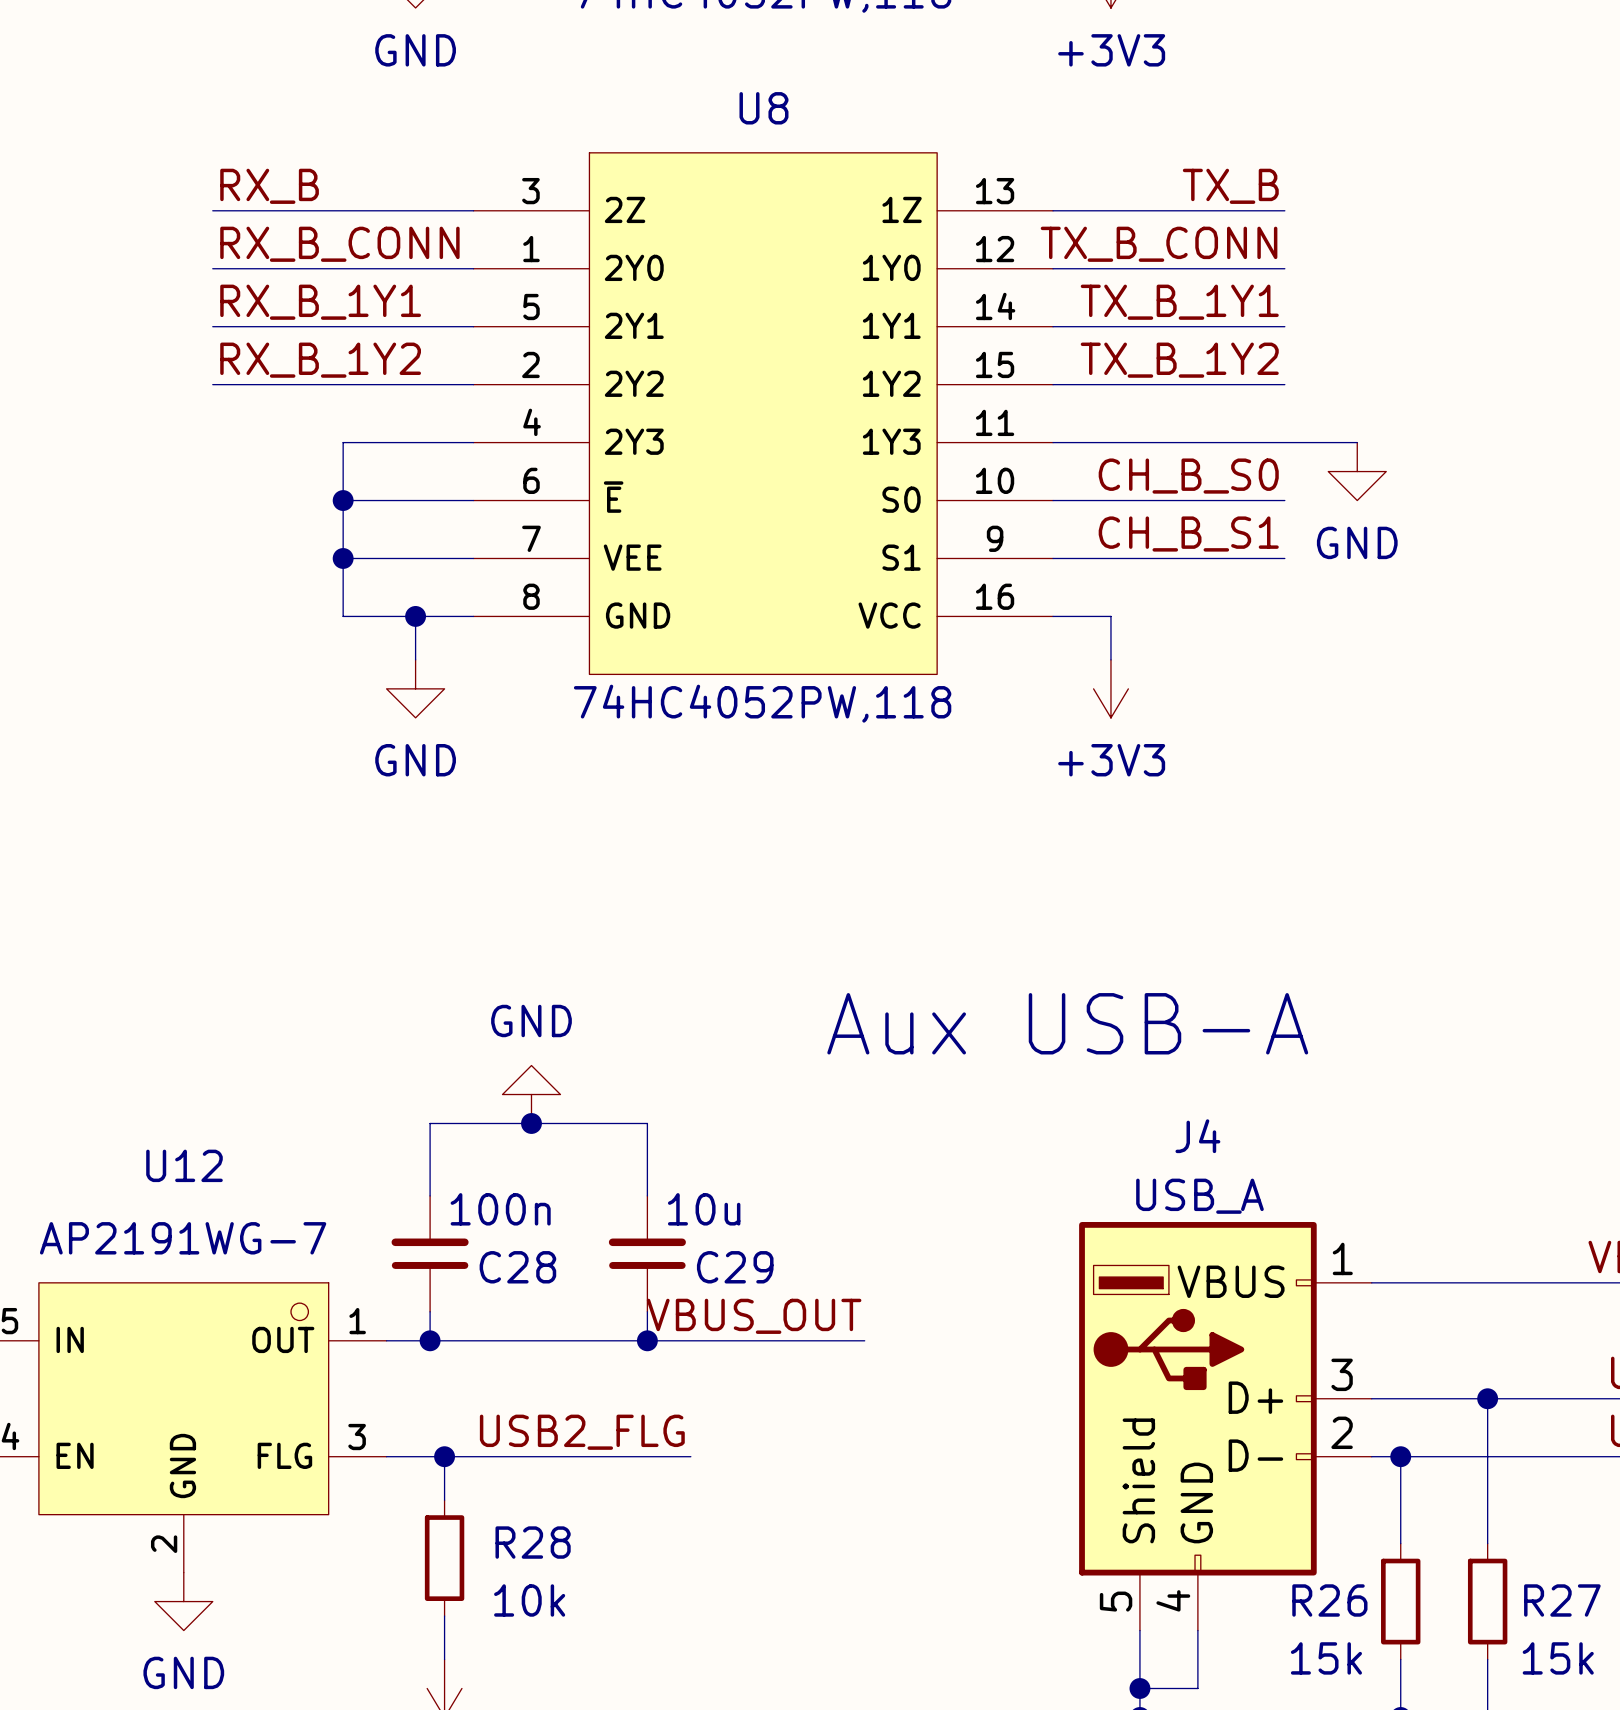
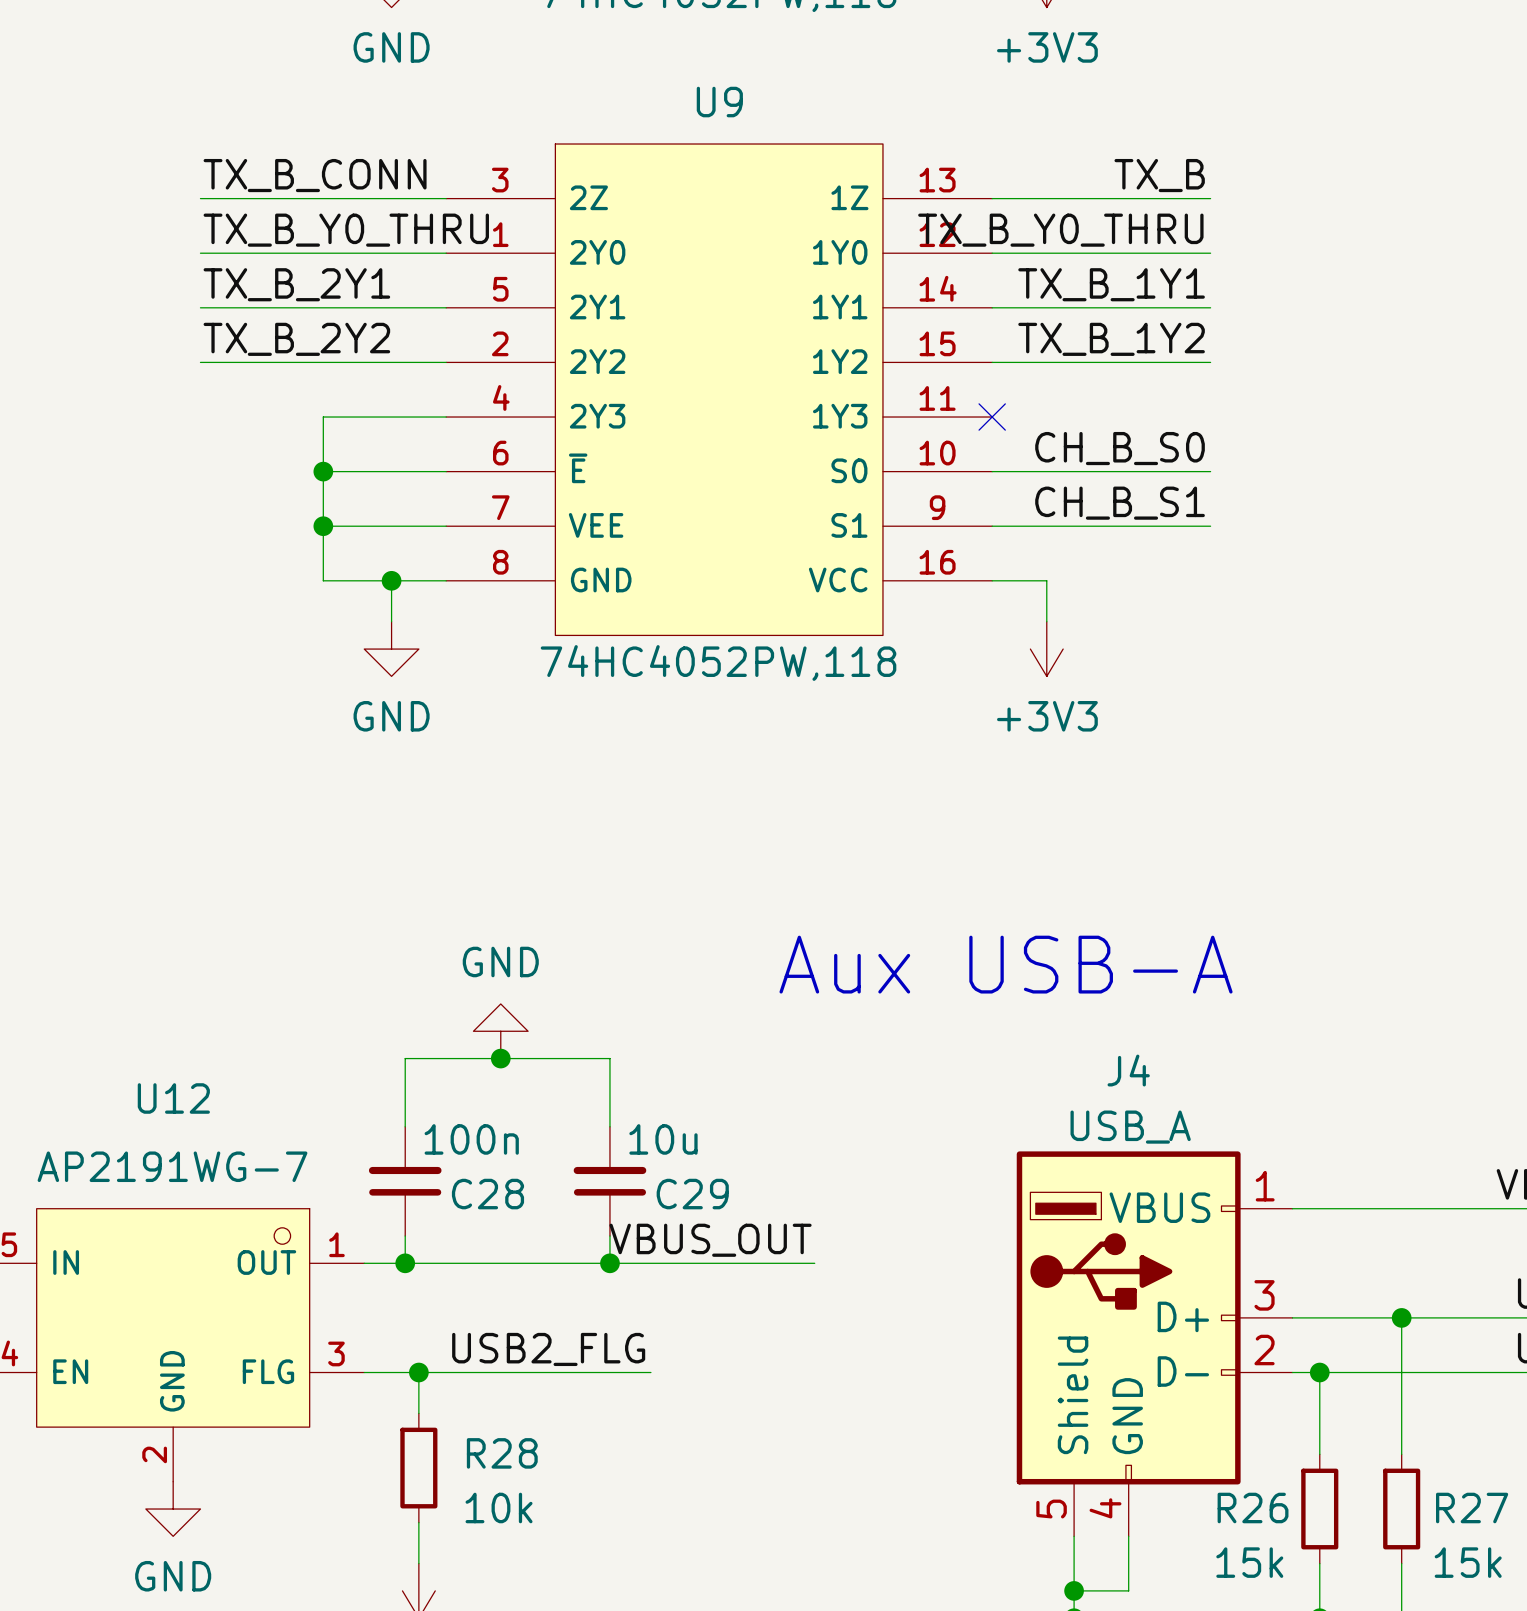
U8 name: U8 (763, 108) -> U9 (719, 102)
label: RX_B (269, 186) -> TX_B_CONN (315, 175)
label: RX_B_CONN (339, 244) -> TX_B_Y0_THRU (346, 230)
label: TX_B_CONN (1159, 244) -> TX_B_Y0_THRU (1060, 230)
label: RX_B_1Y1 (320, 302) -> TX_B_2Y1 (296, 284)
label: RX_B_1Y2 (320, 360) -> TX_B_2Y2 (296, 339)
wire: (1053, 442) (1357, 442) -> none
no-connect mark: none -> (992, 417)
power symbol: GND (1357, 471) -> none

